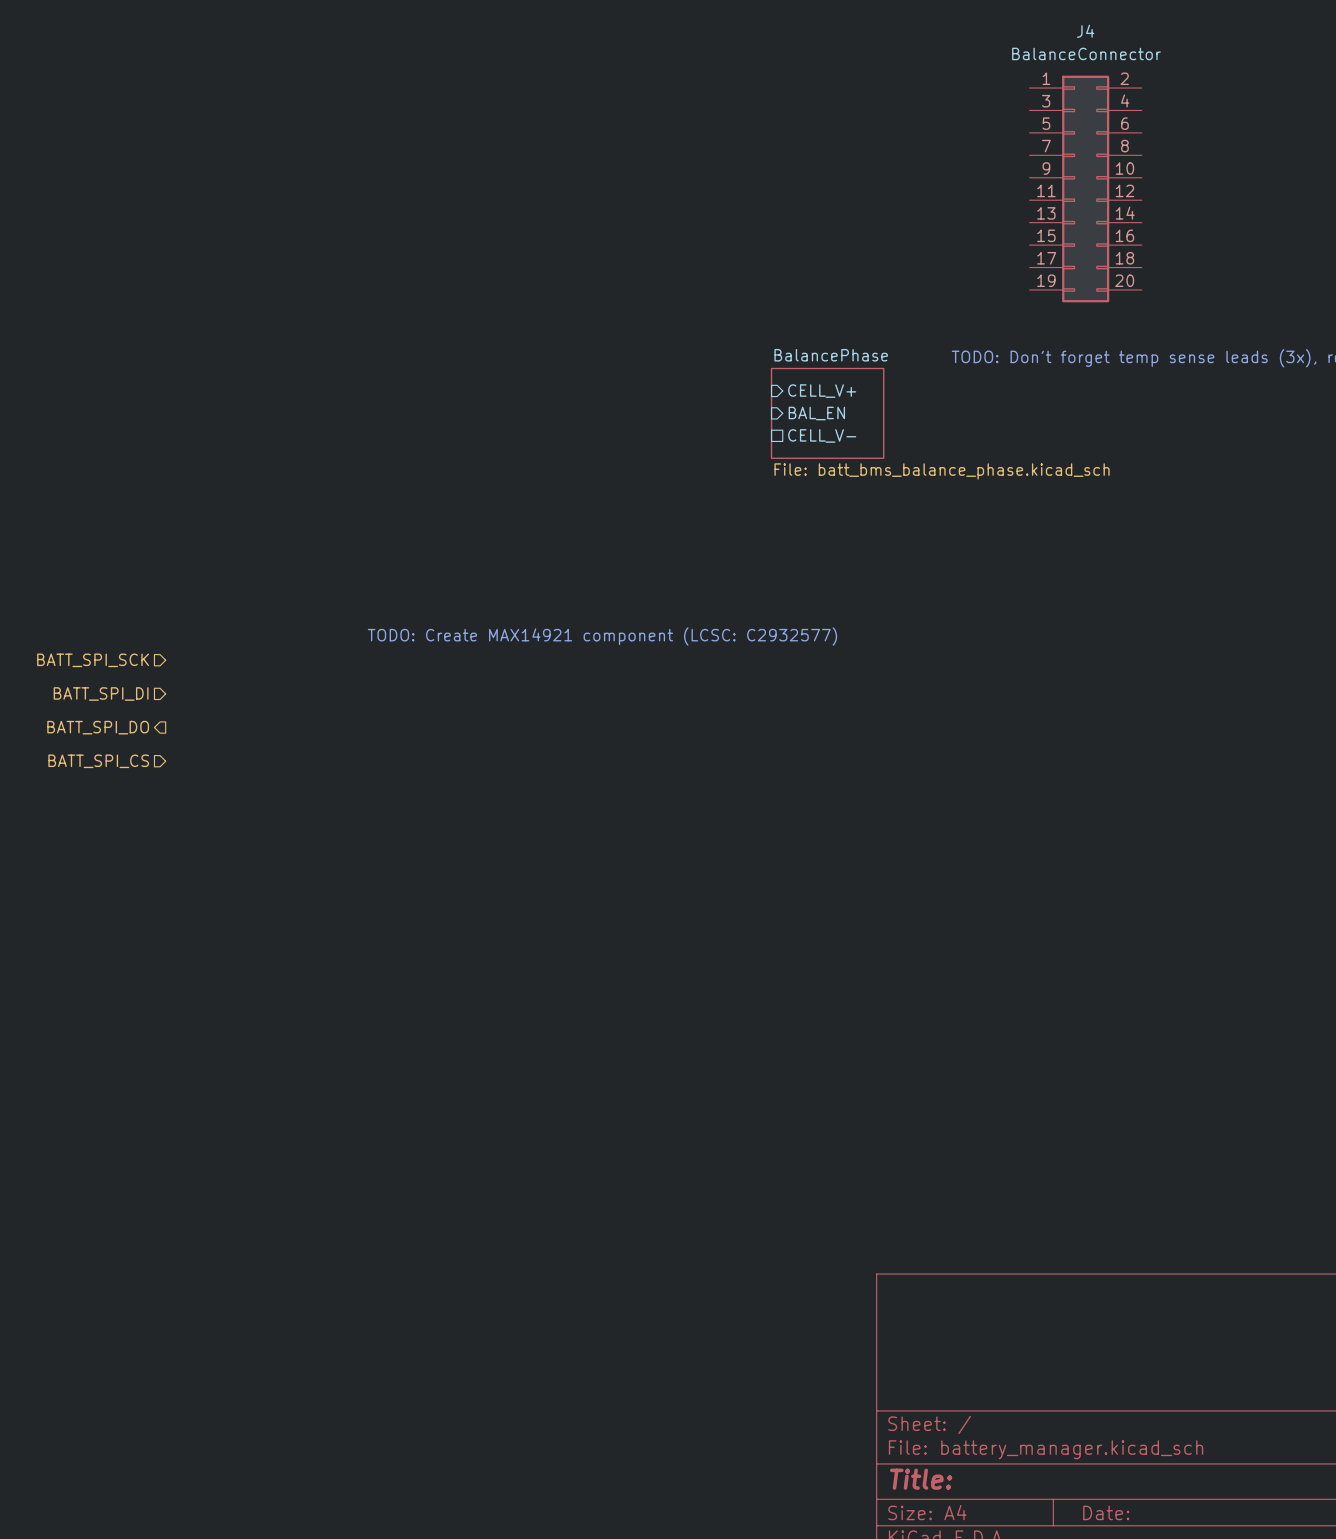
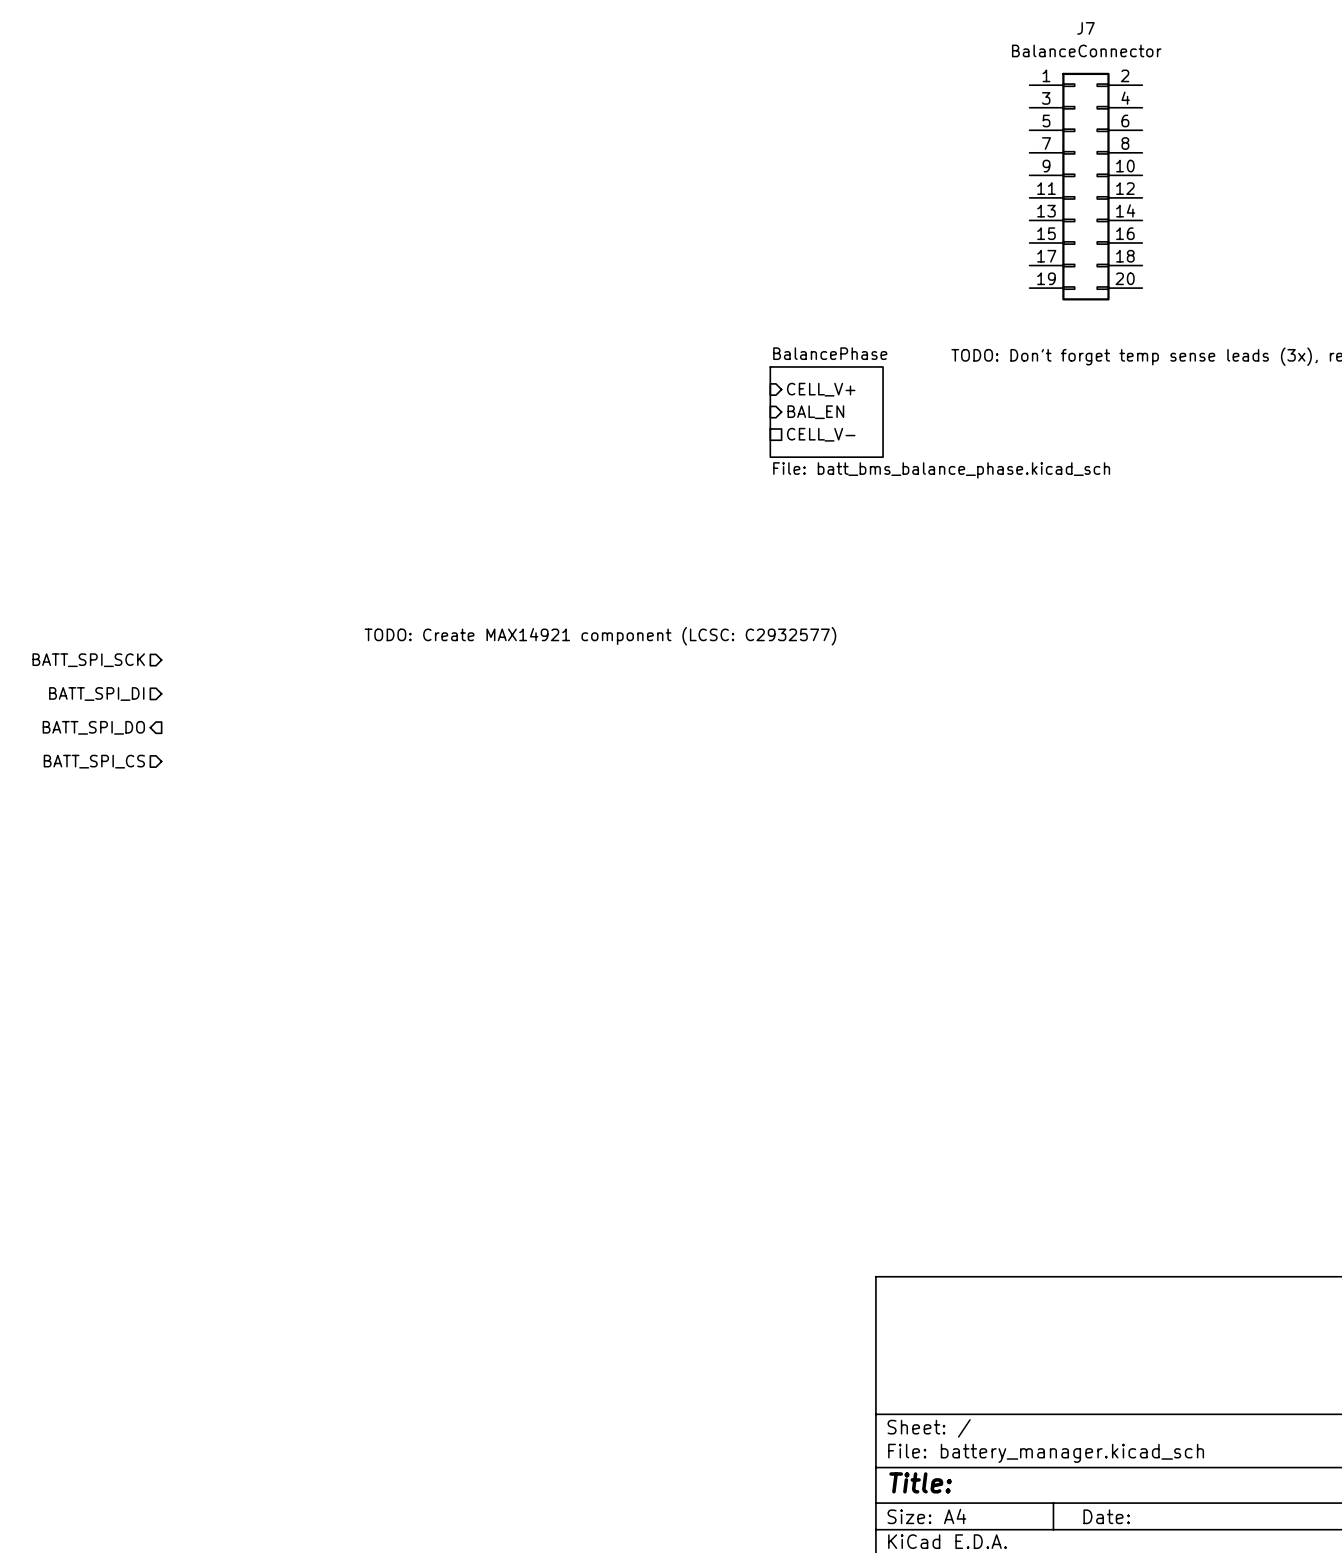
J4 name: J4 (1085, 31) -> J7 (1085, 28)

